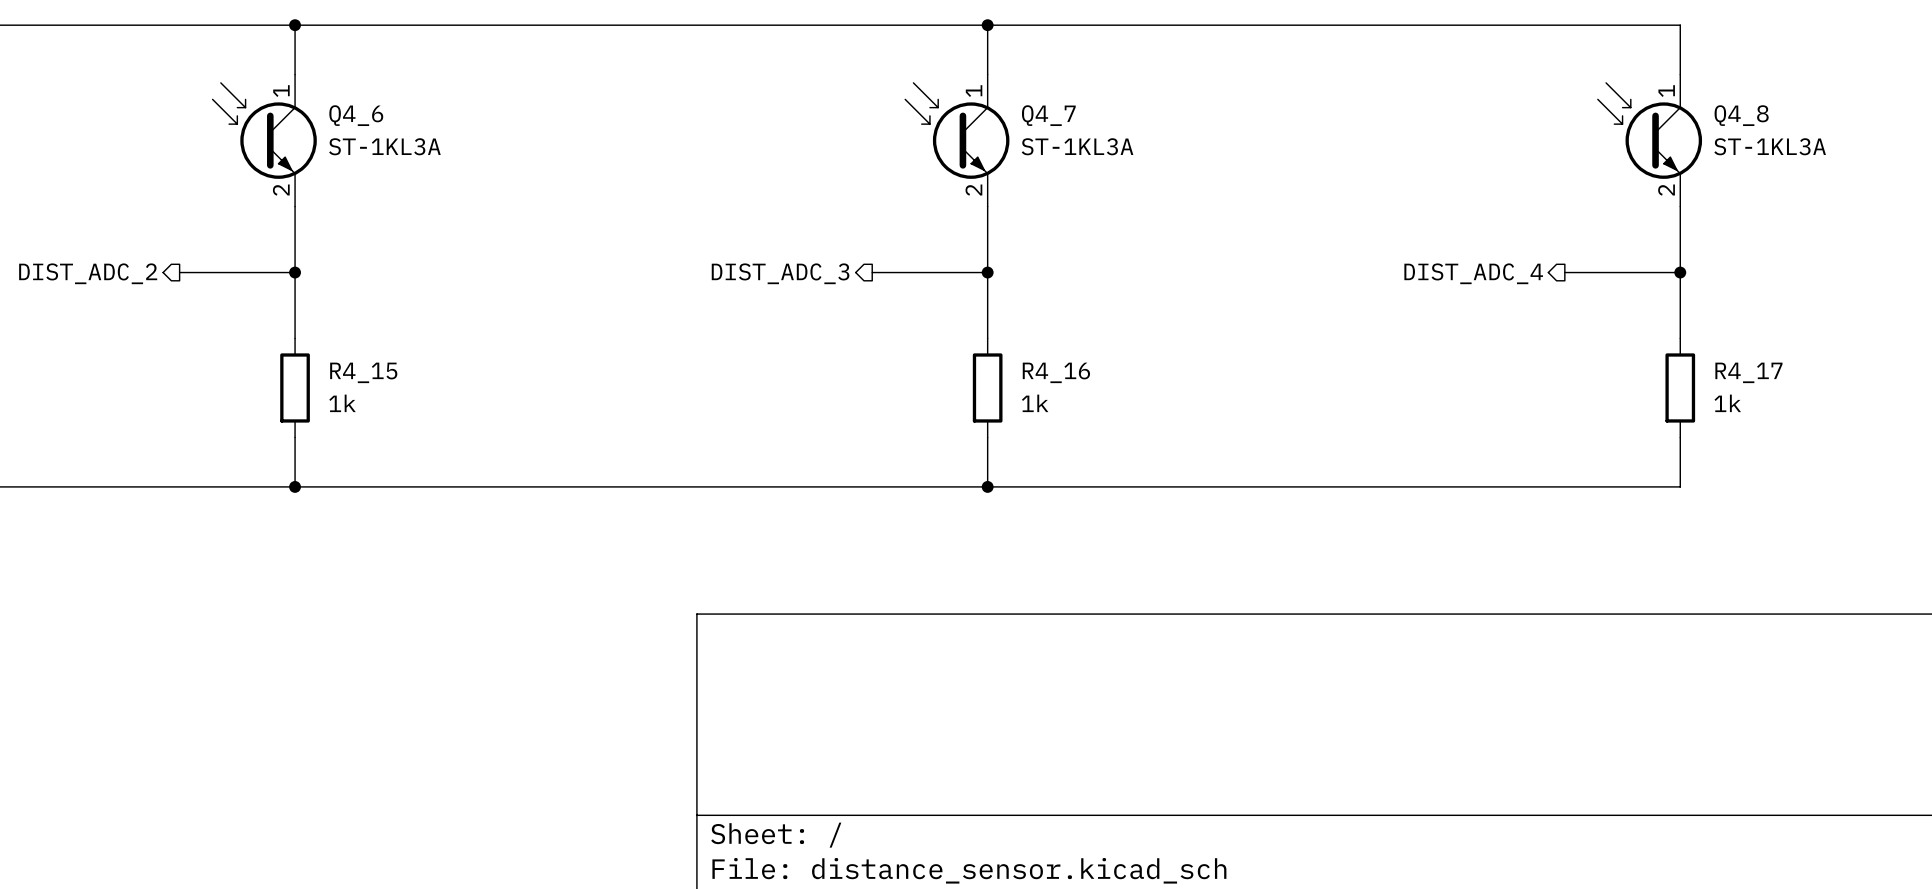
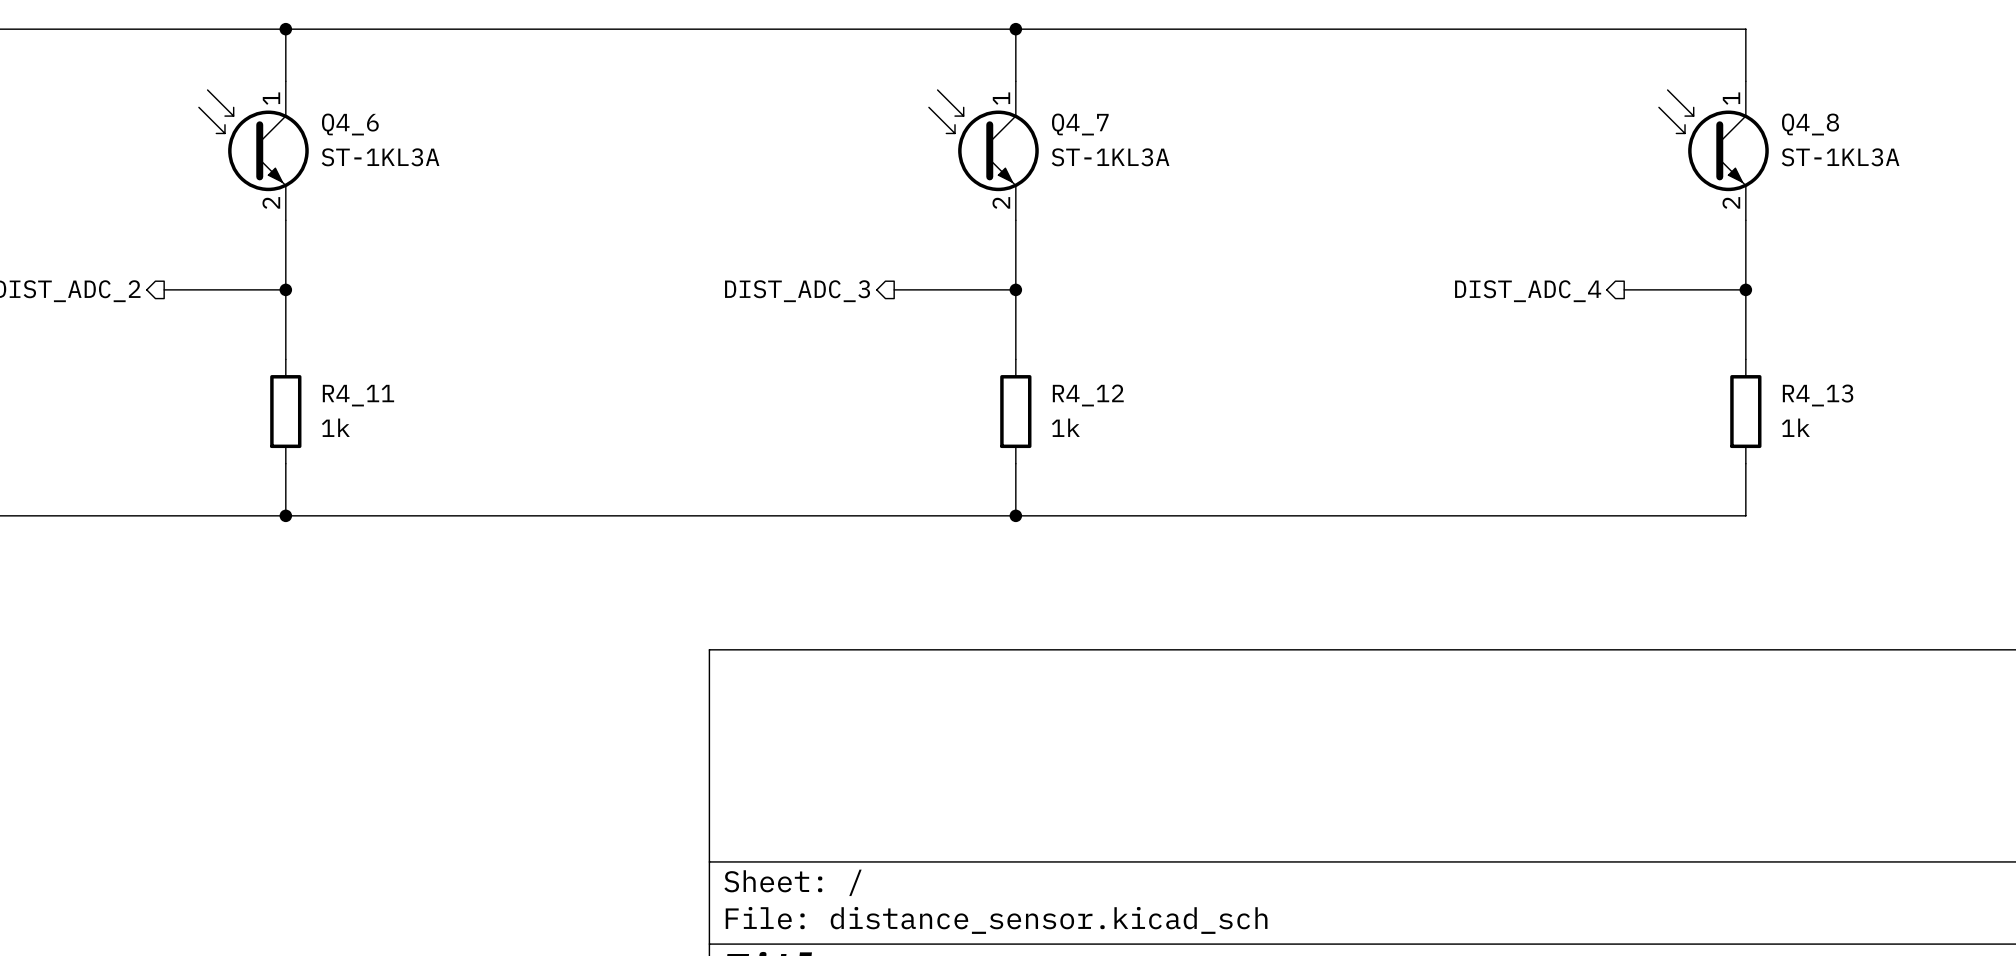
R4_15 name: R4_15 (363, 372) -> R4_11 (358, 395)
R4_16 name: R4_16 (1056, 372) -> R4_12 (1088, 395)
R4_17 name: R4_17 (1748, 372) -> R4_13 (1818, 395)

